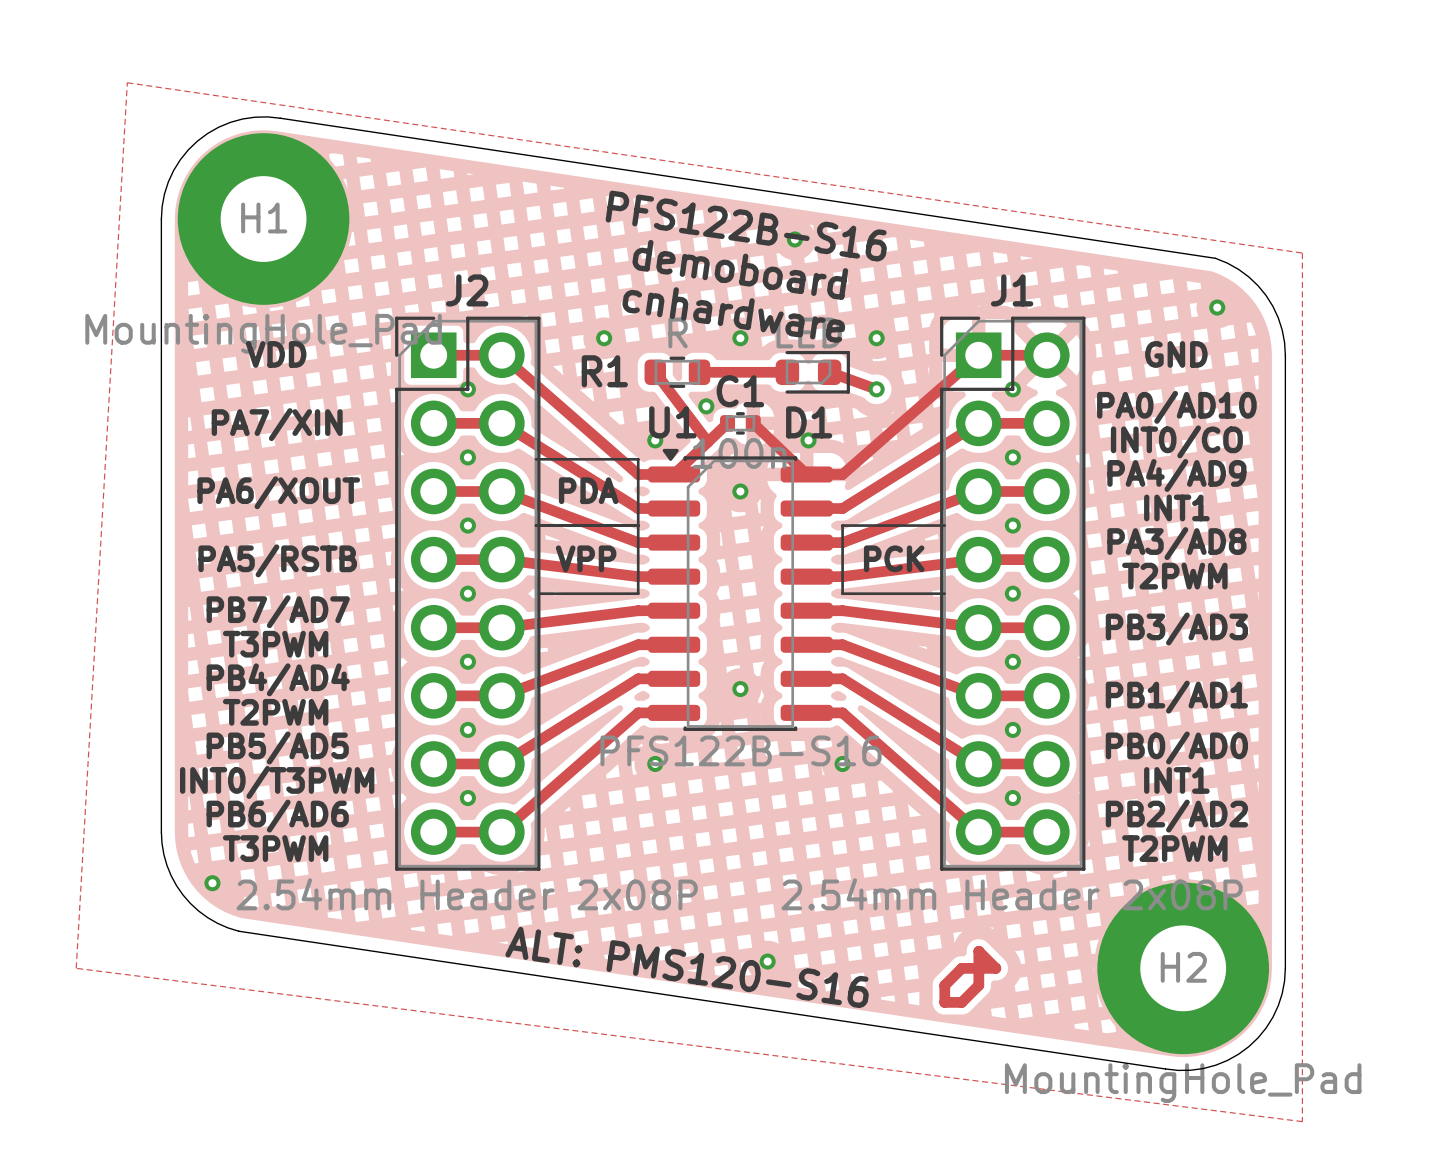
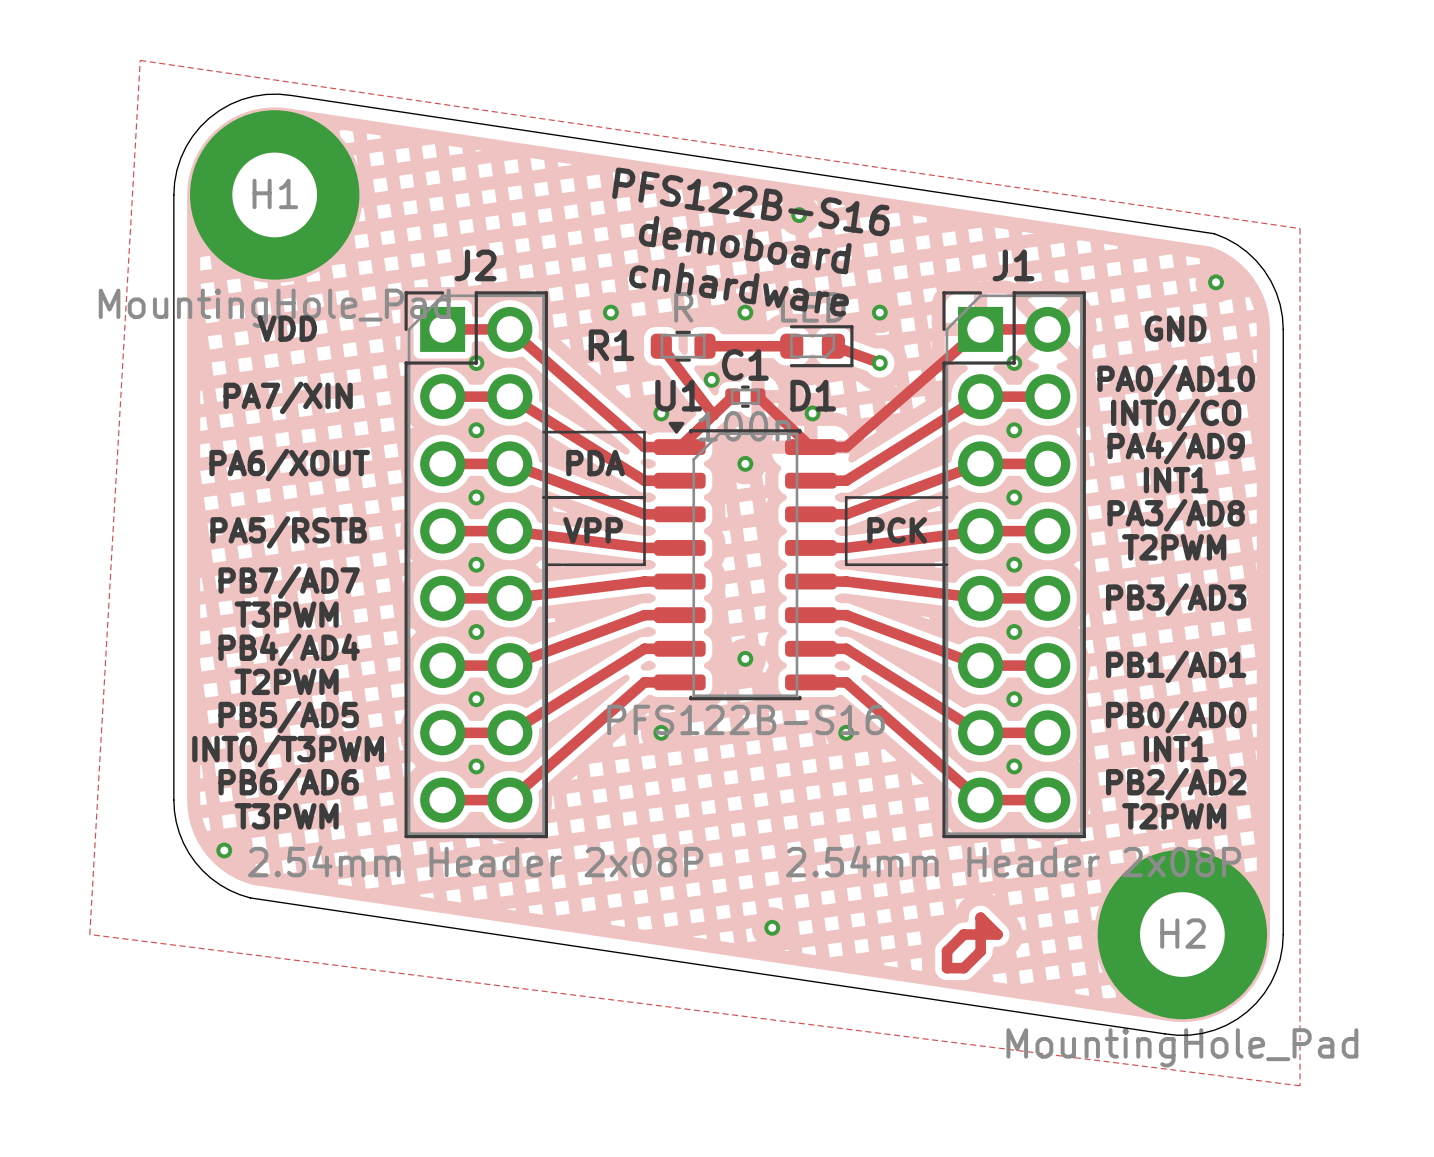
text rotation: 0° (746, 226) -> 0.2° counterclockwise (750, 201)
text rotation: 0° (740, 269) -> 0.2° counterclockwise (745, 245)
text rotation: 0° (733, 315) -> 0.2° counterclockwise (739, 289)
text: ALT: PMS120-S16 (687, 967) -> none

